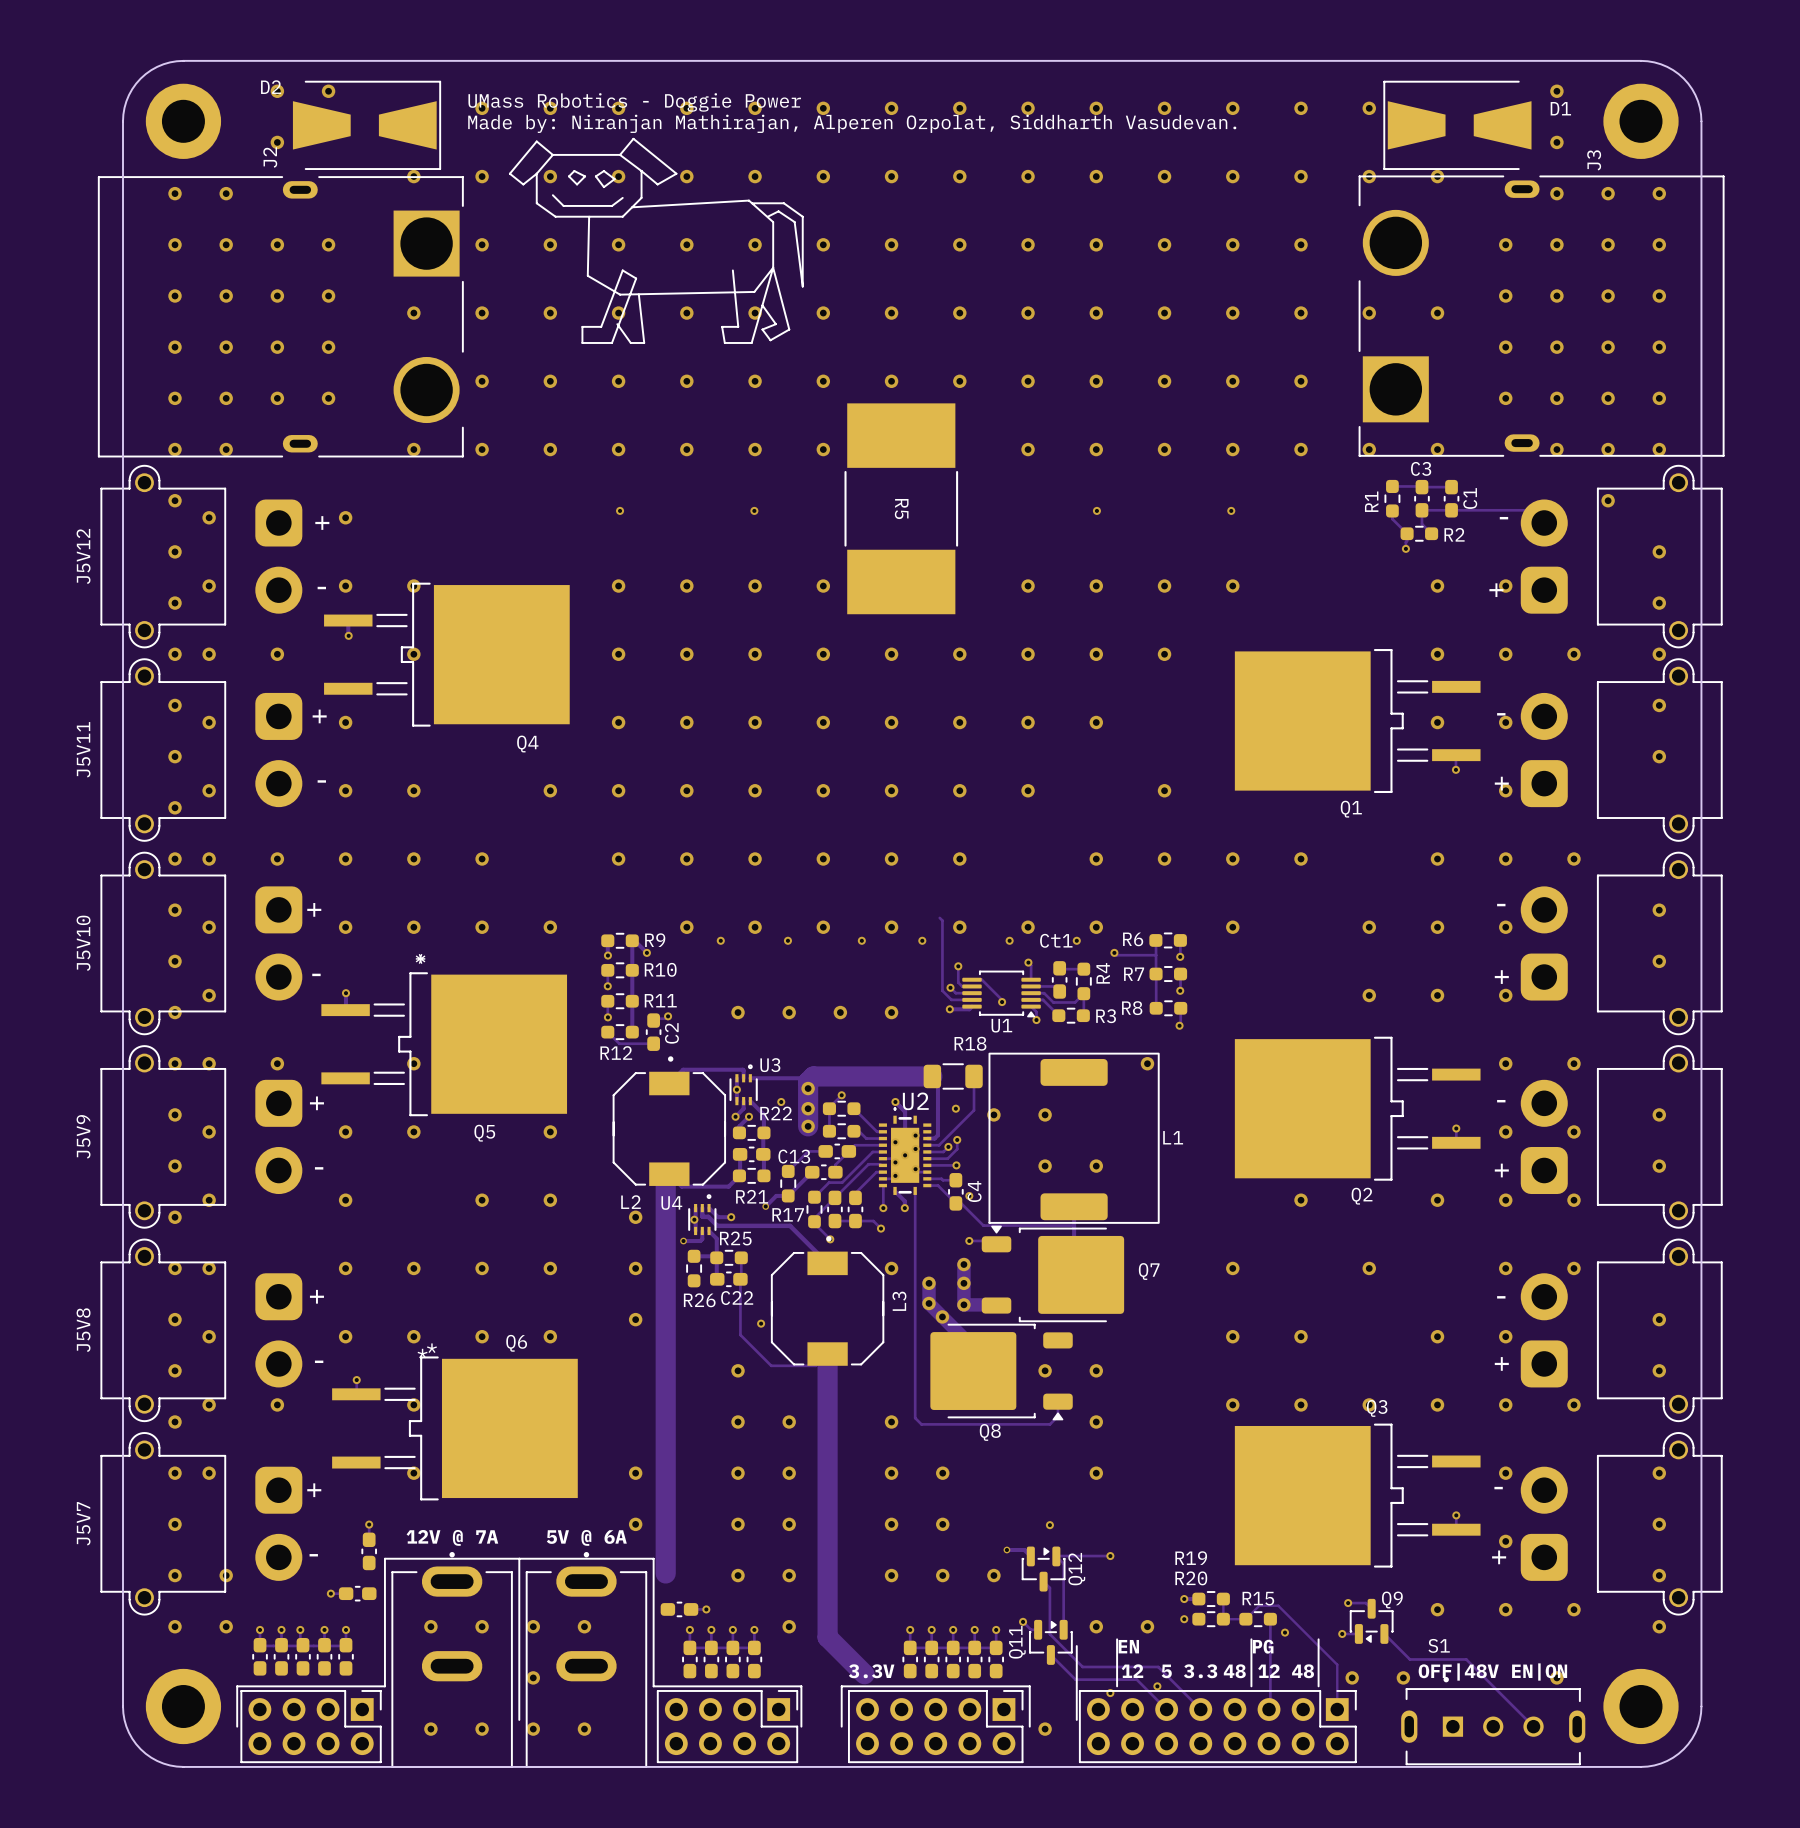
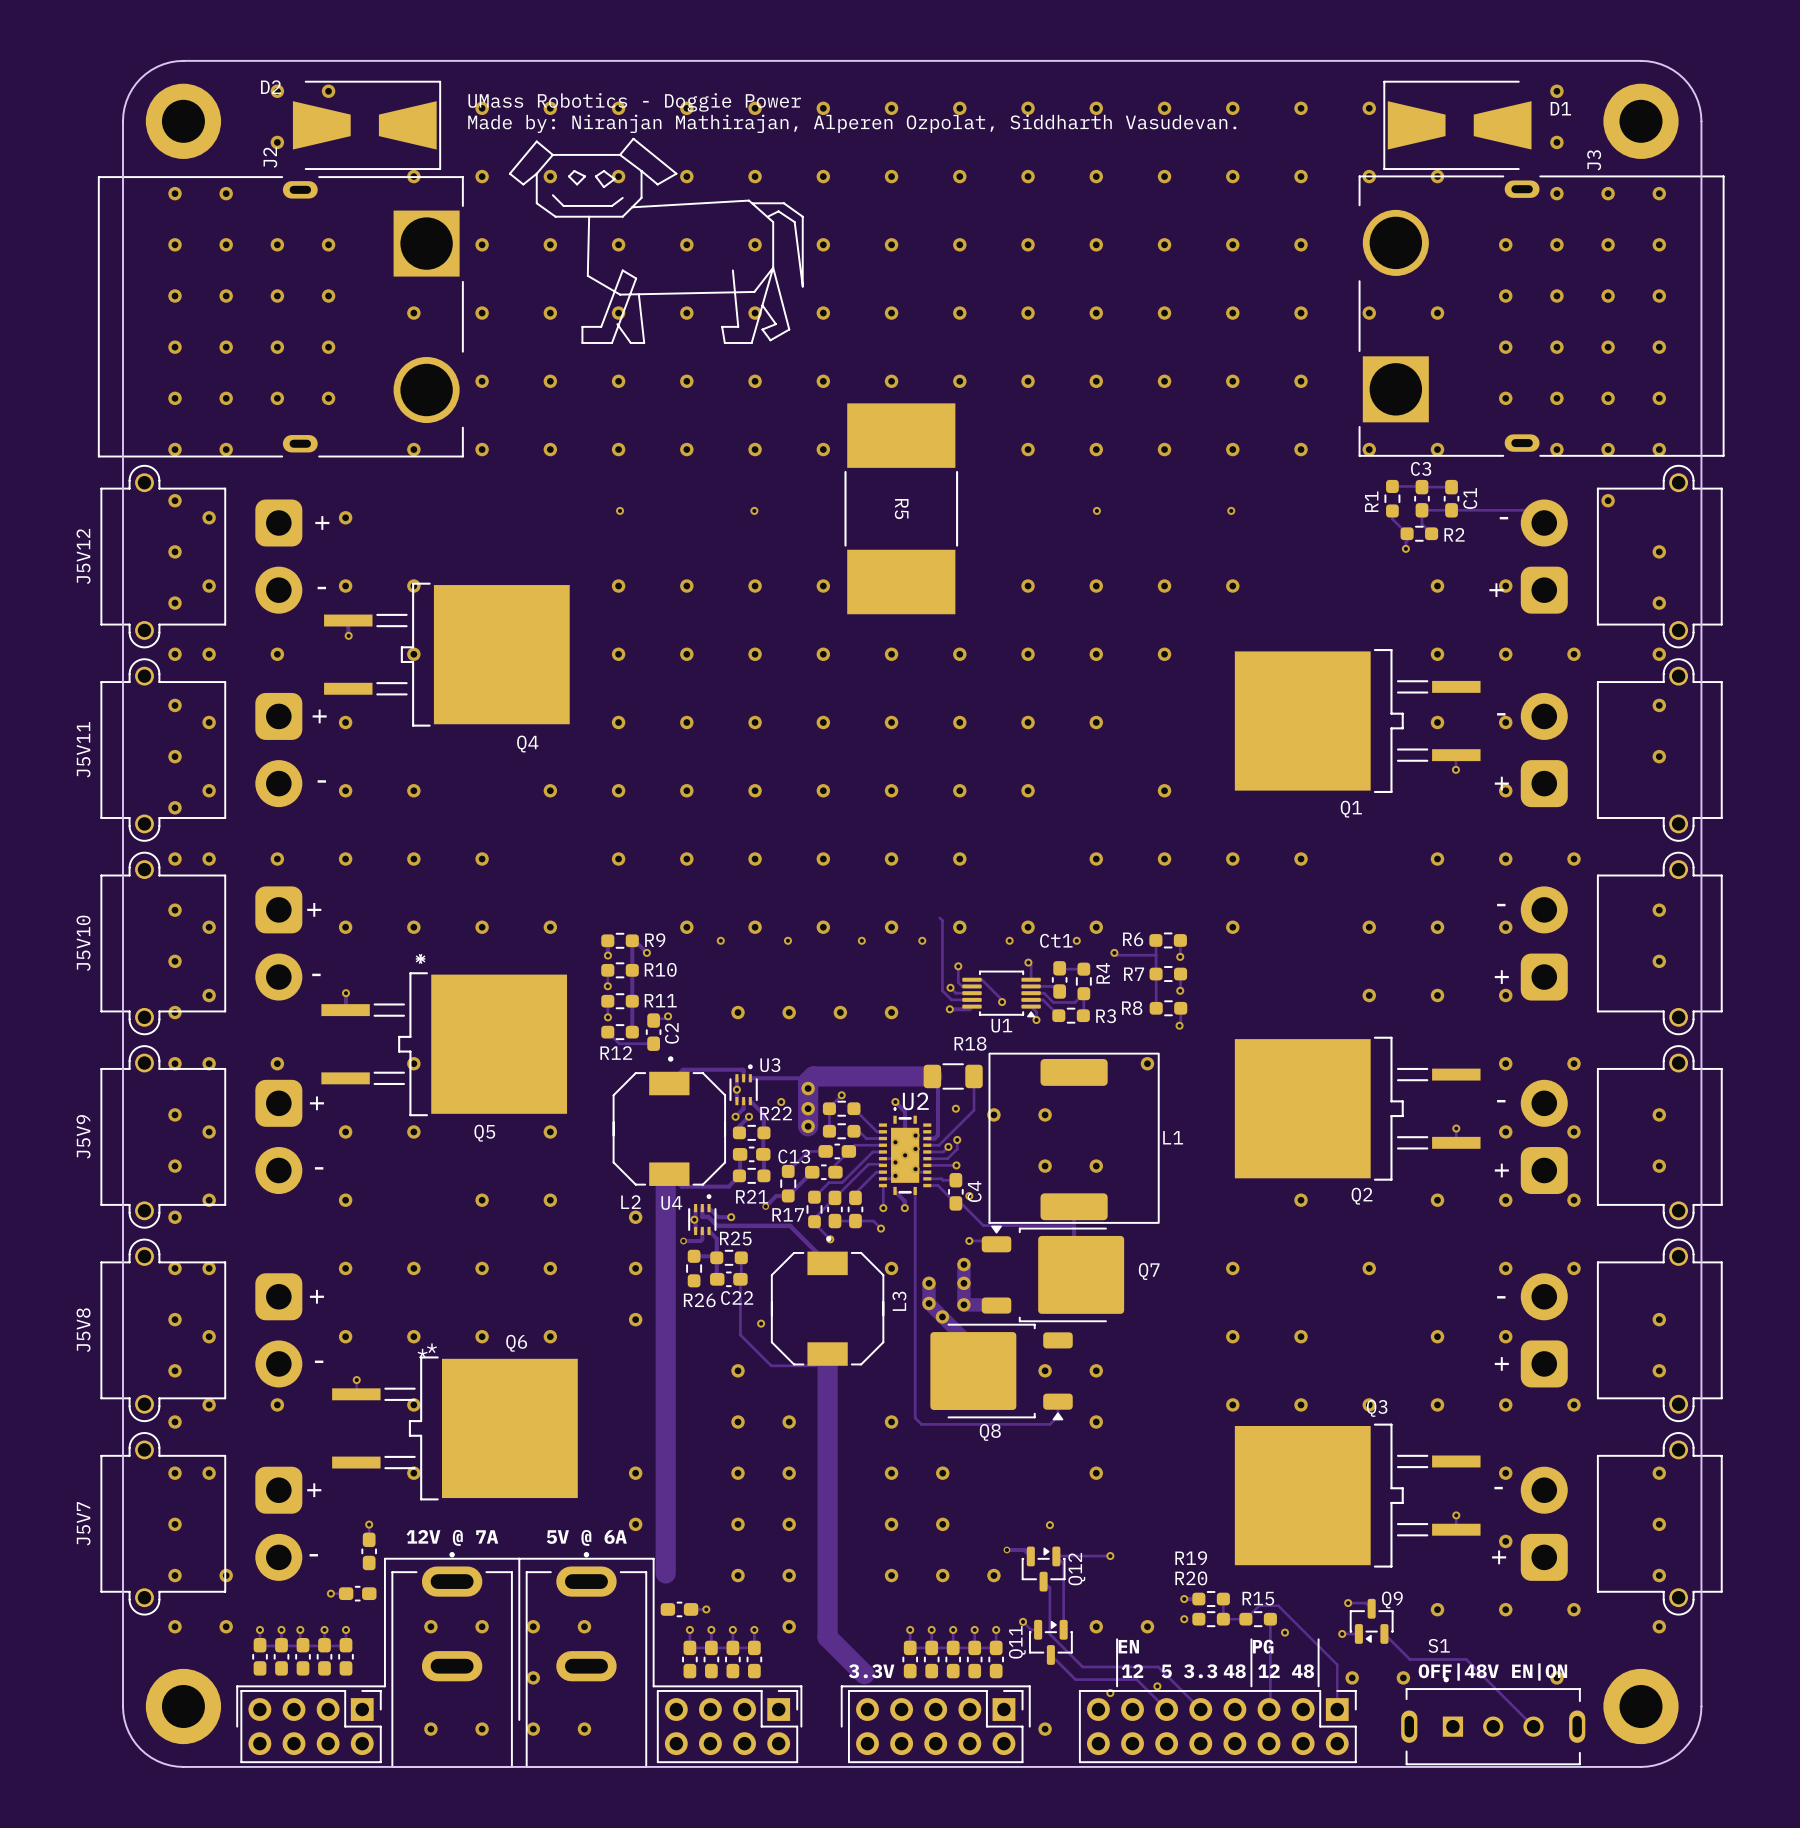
line: (1076, 1646) (1076, 1719) -> none

